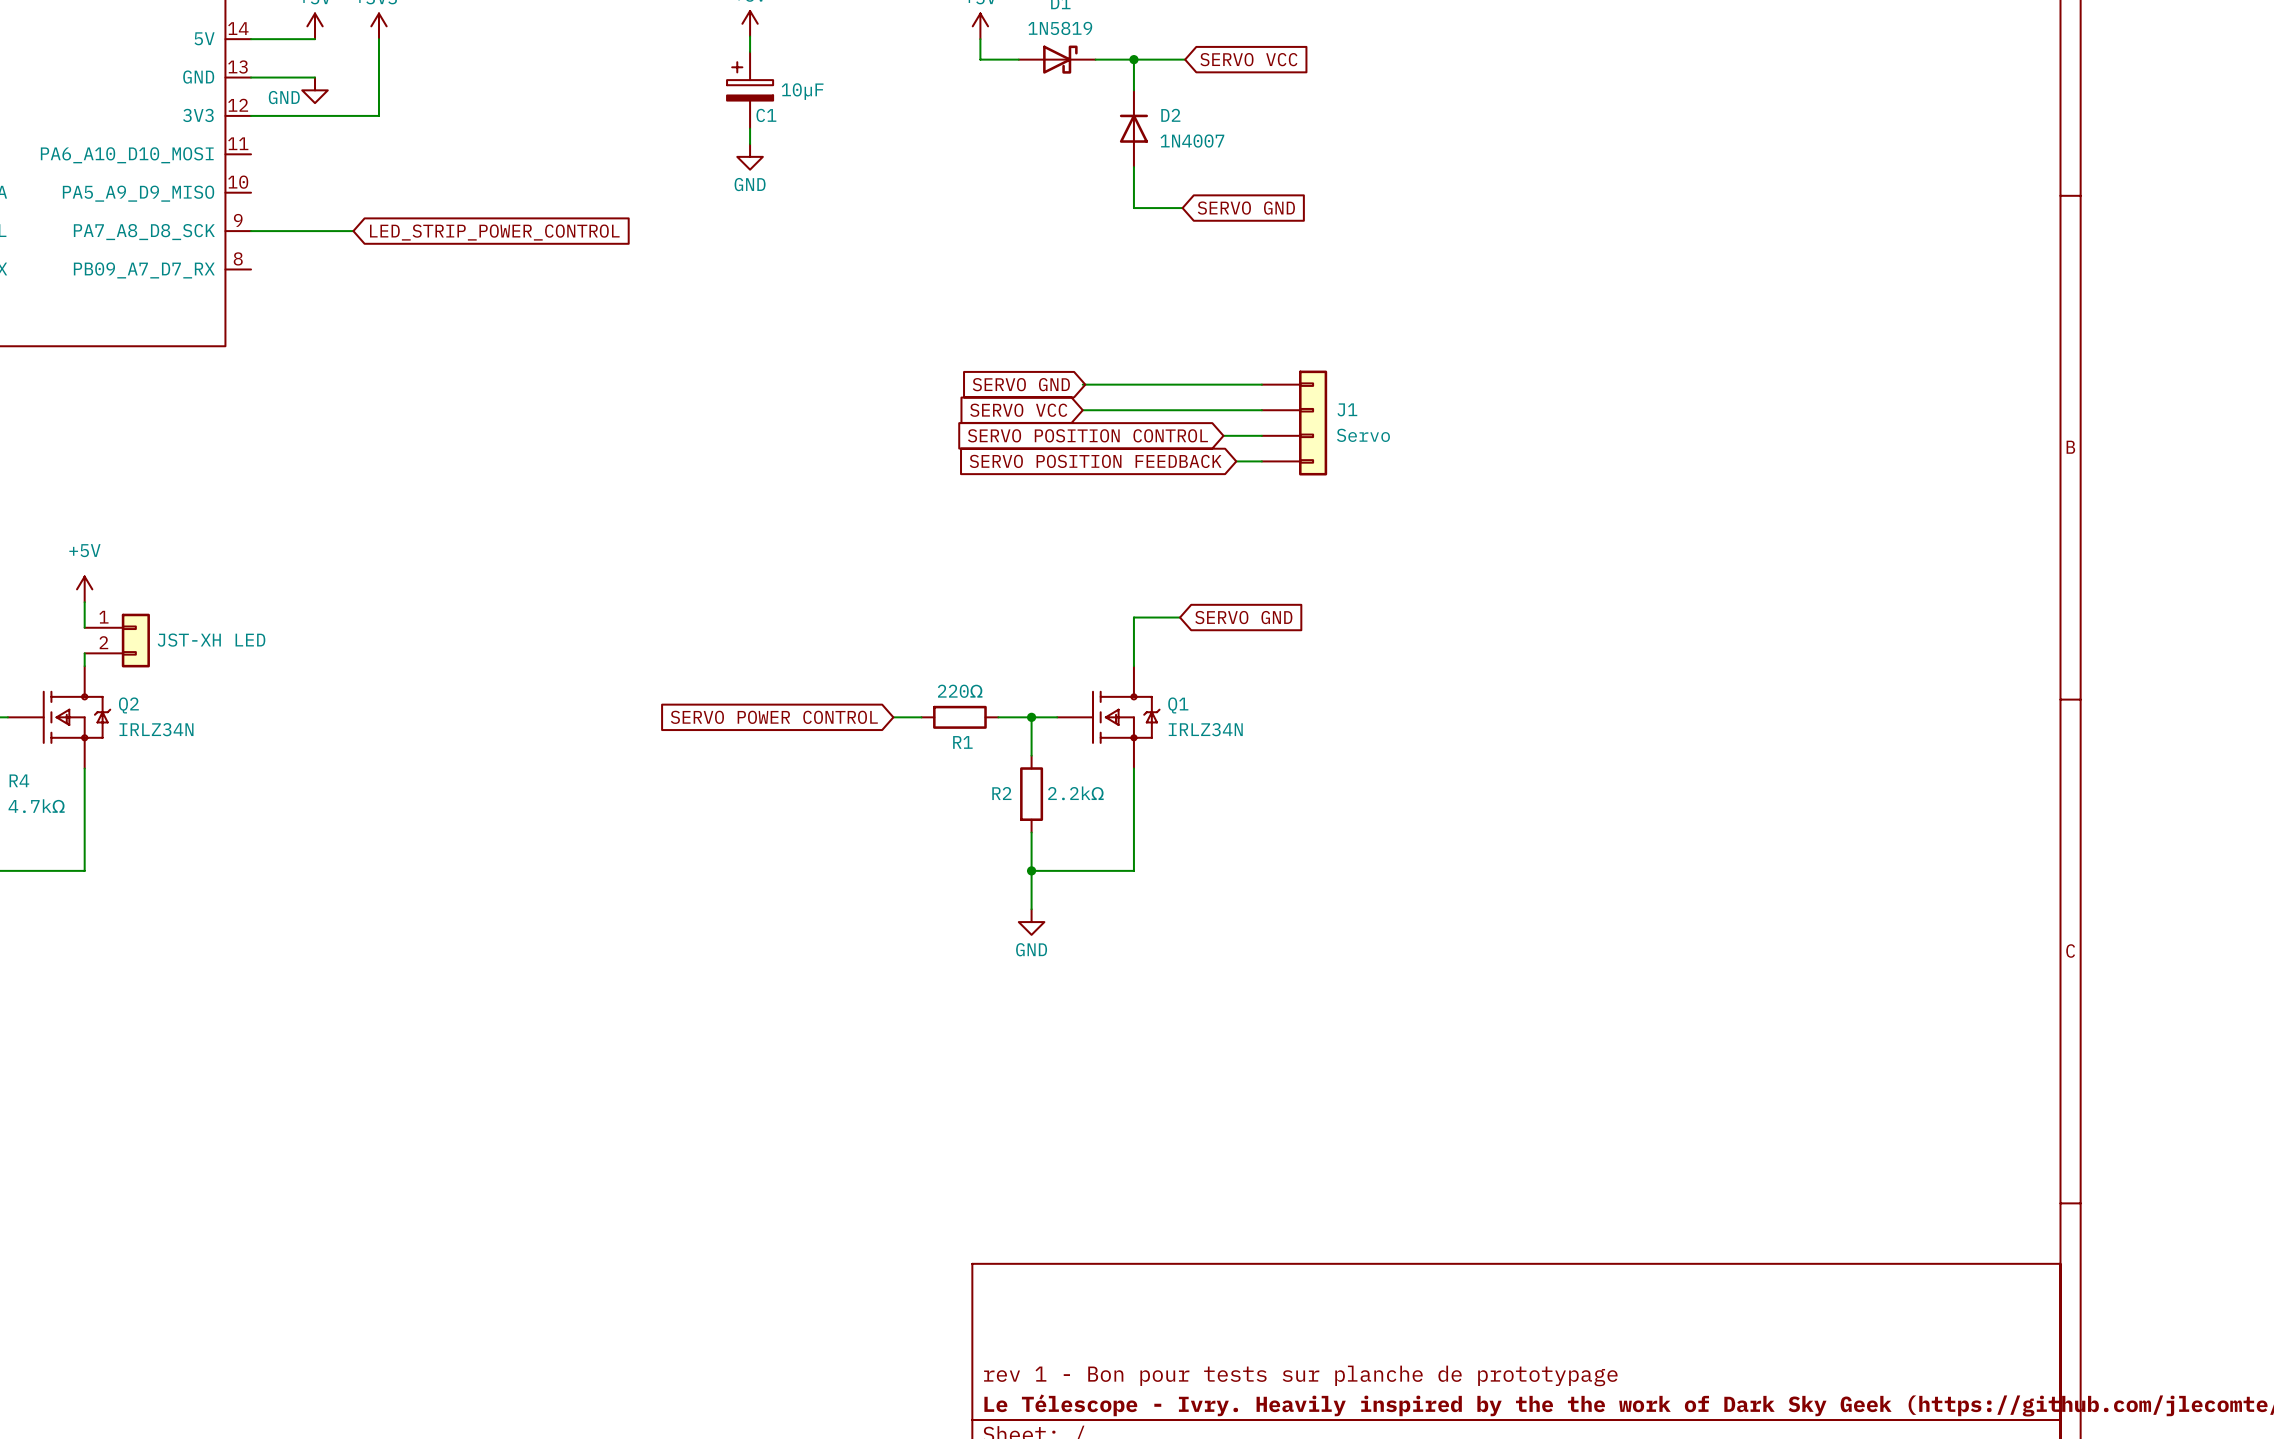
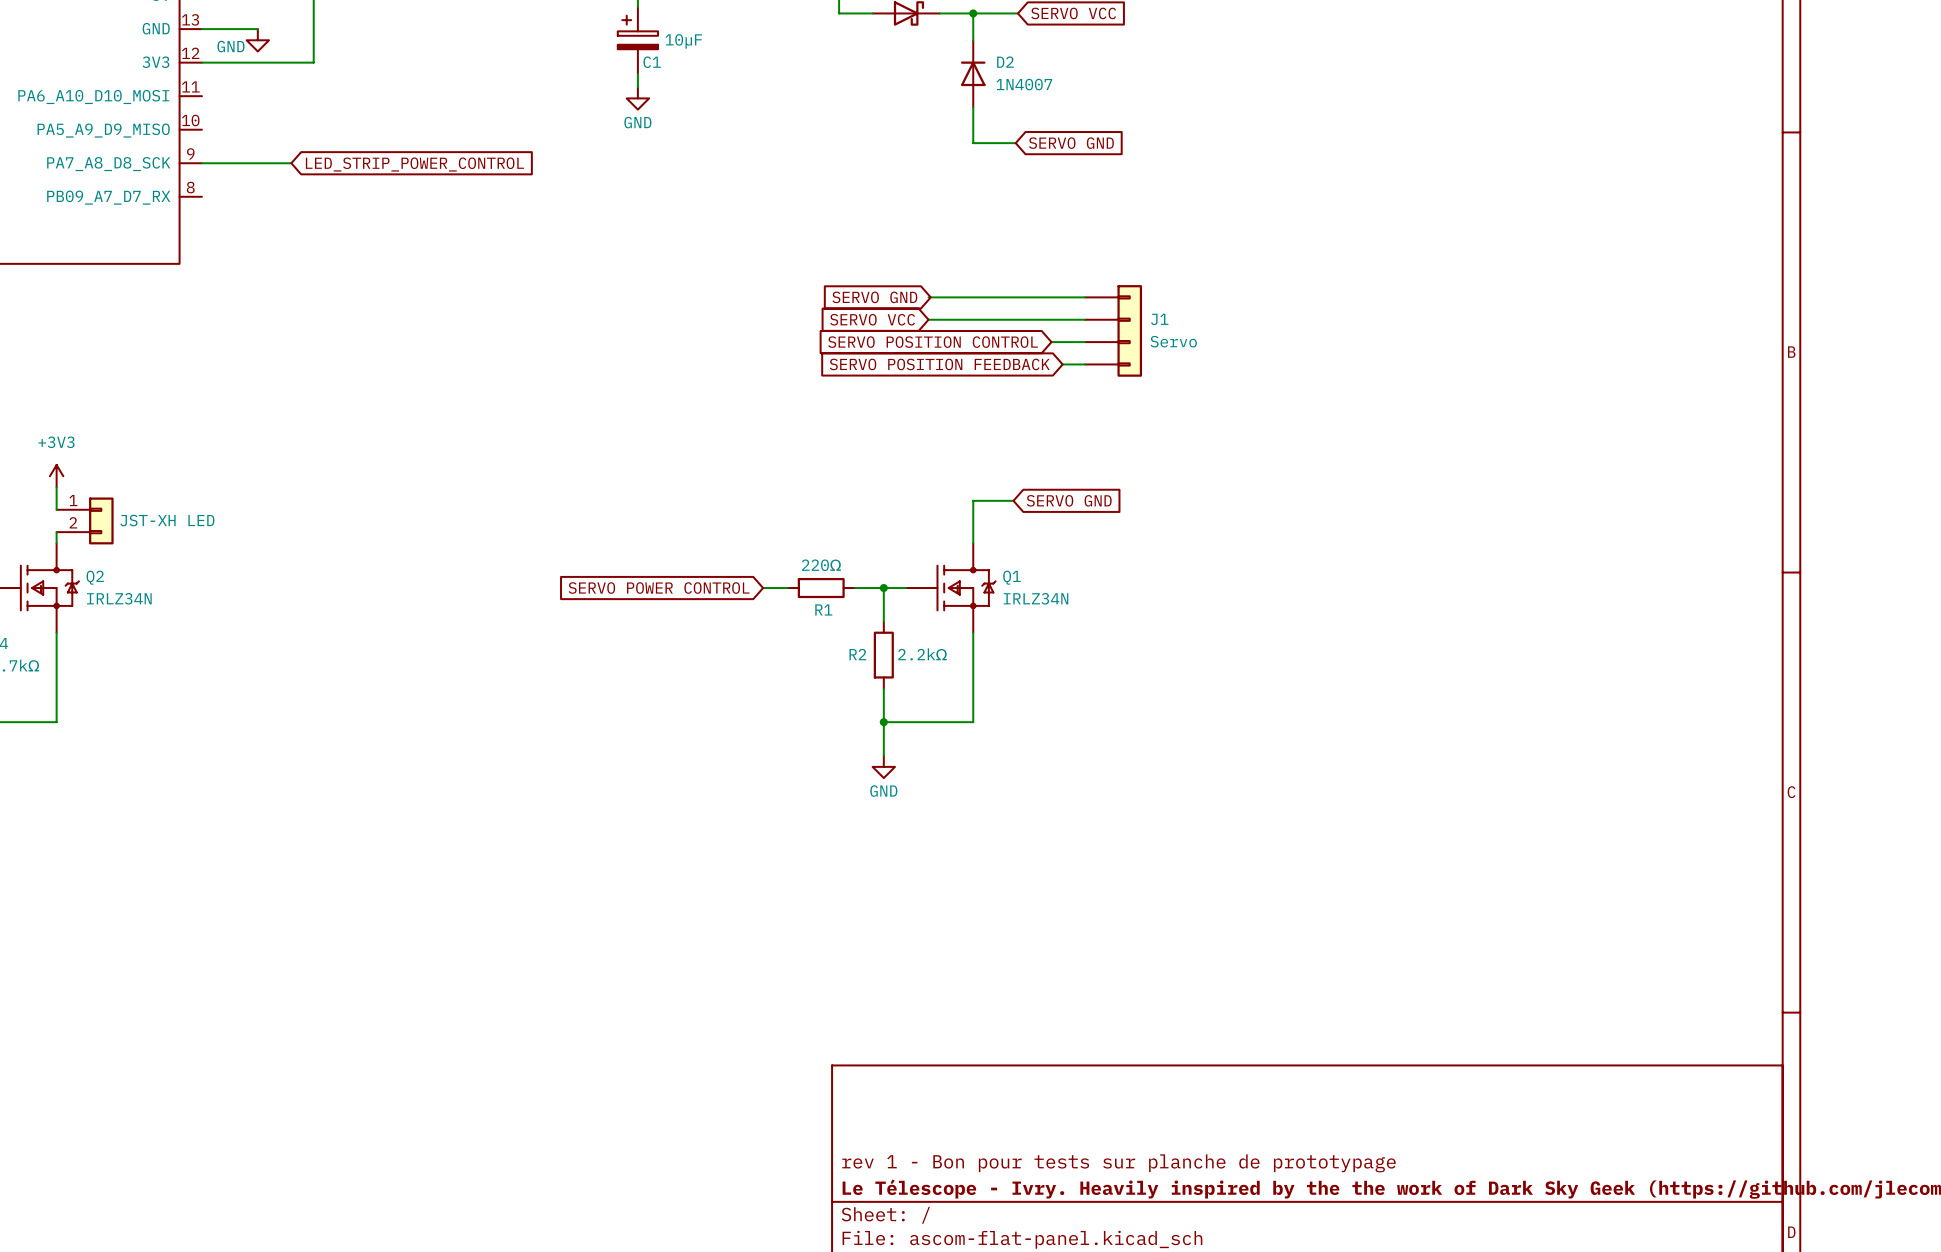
power symbol: +5V (84, 589) -> +3V3 (56, 476)

